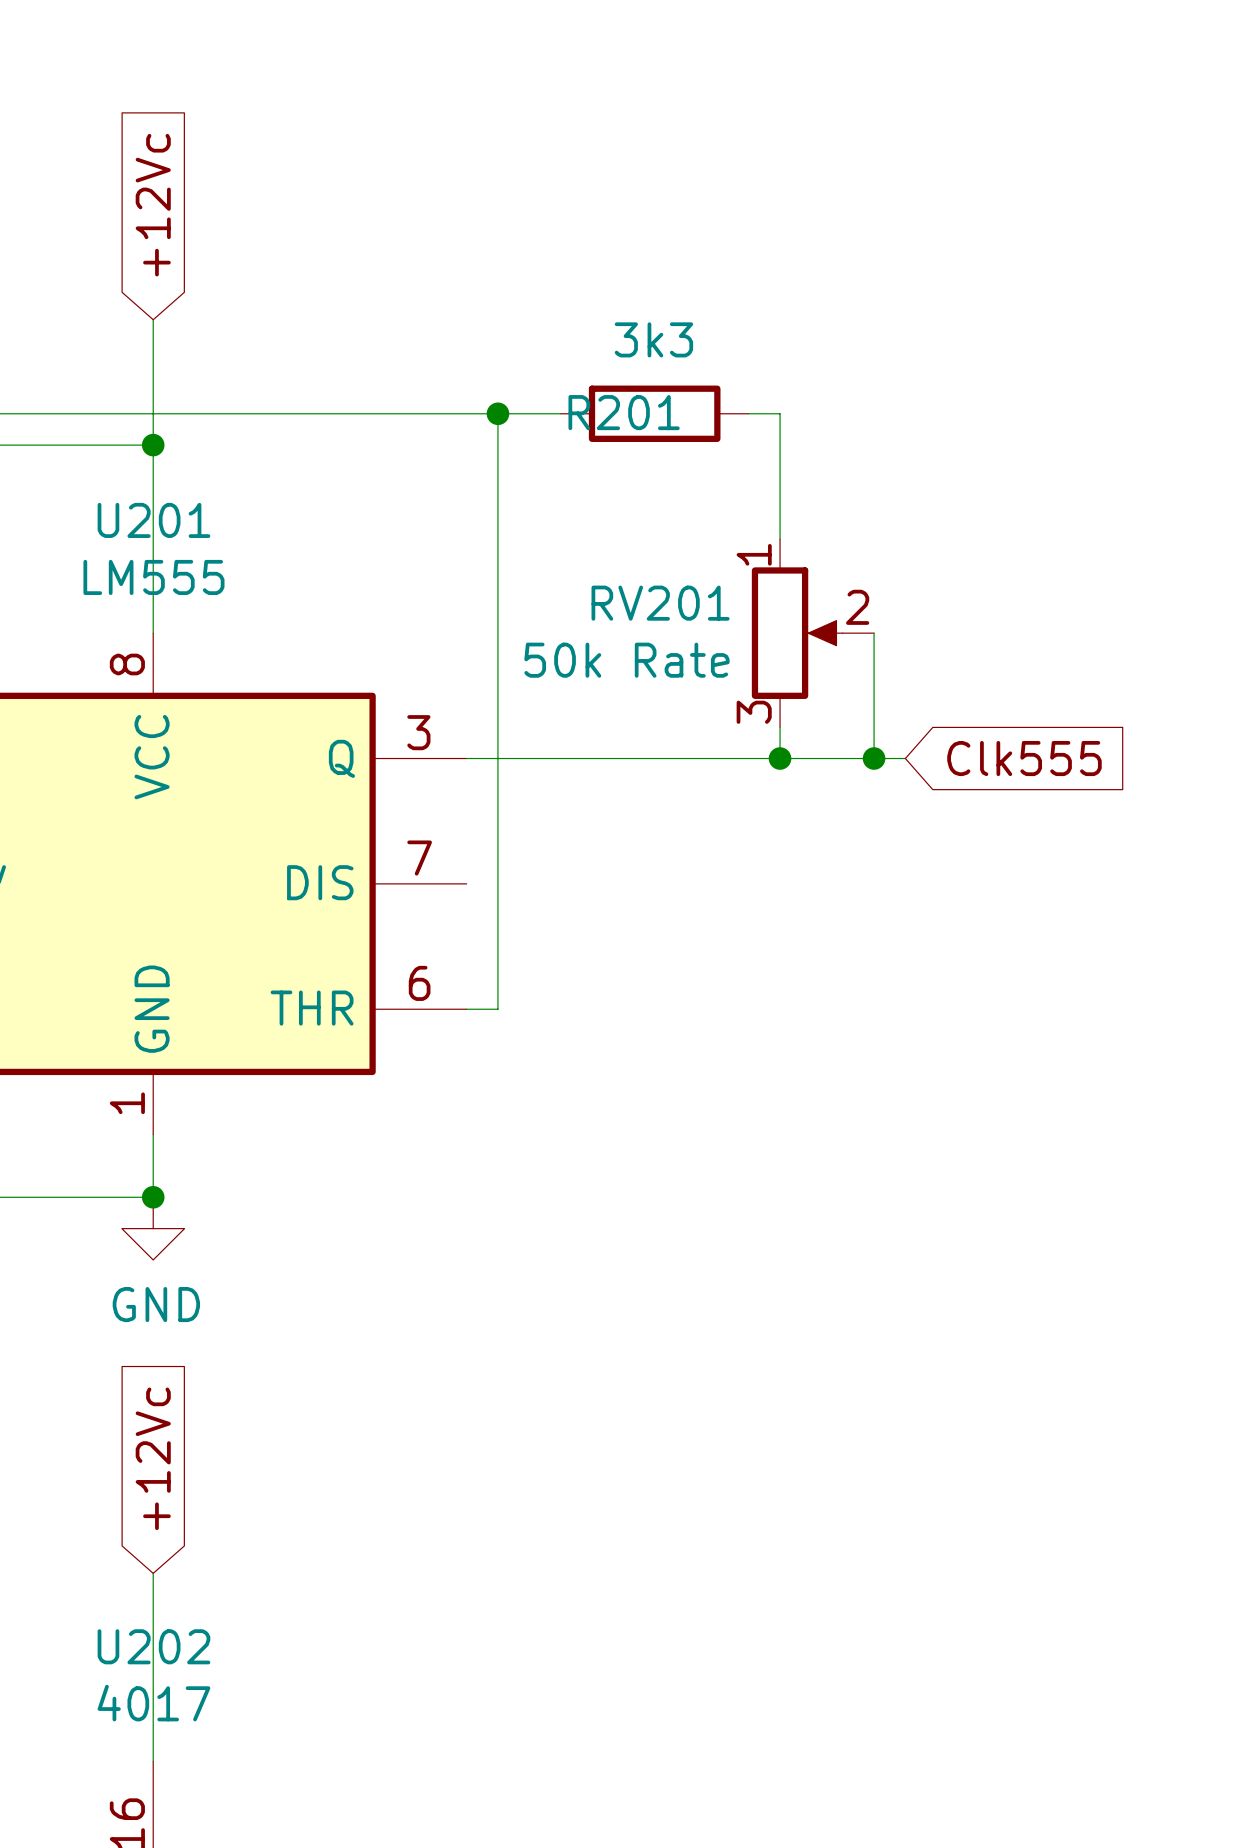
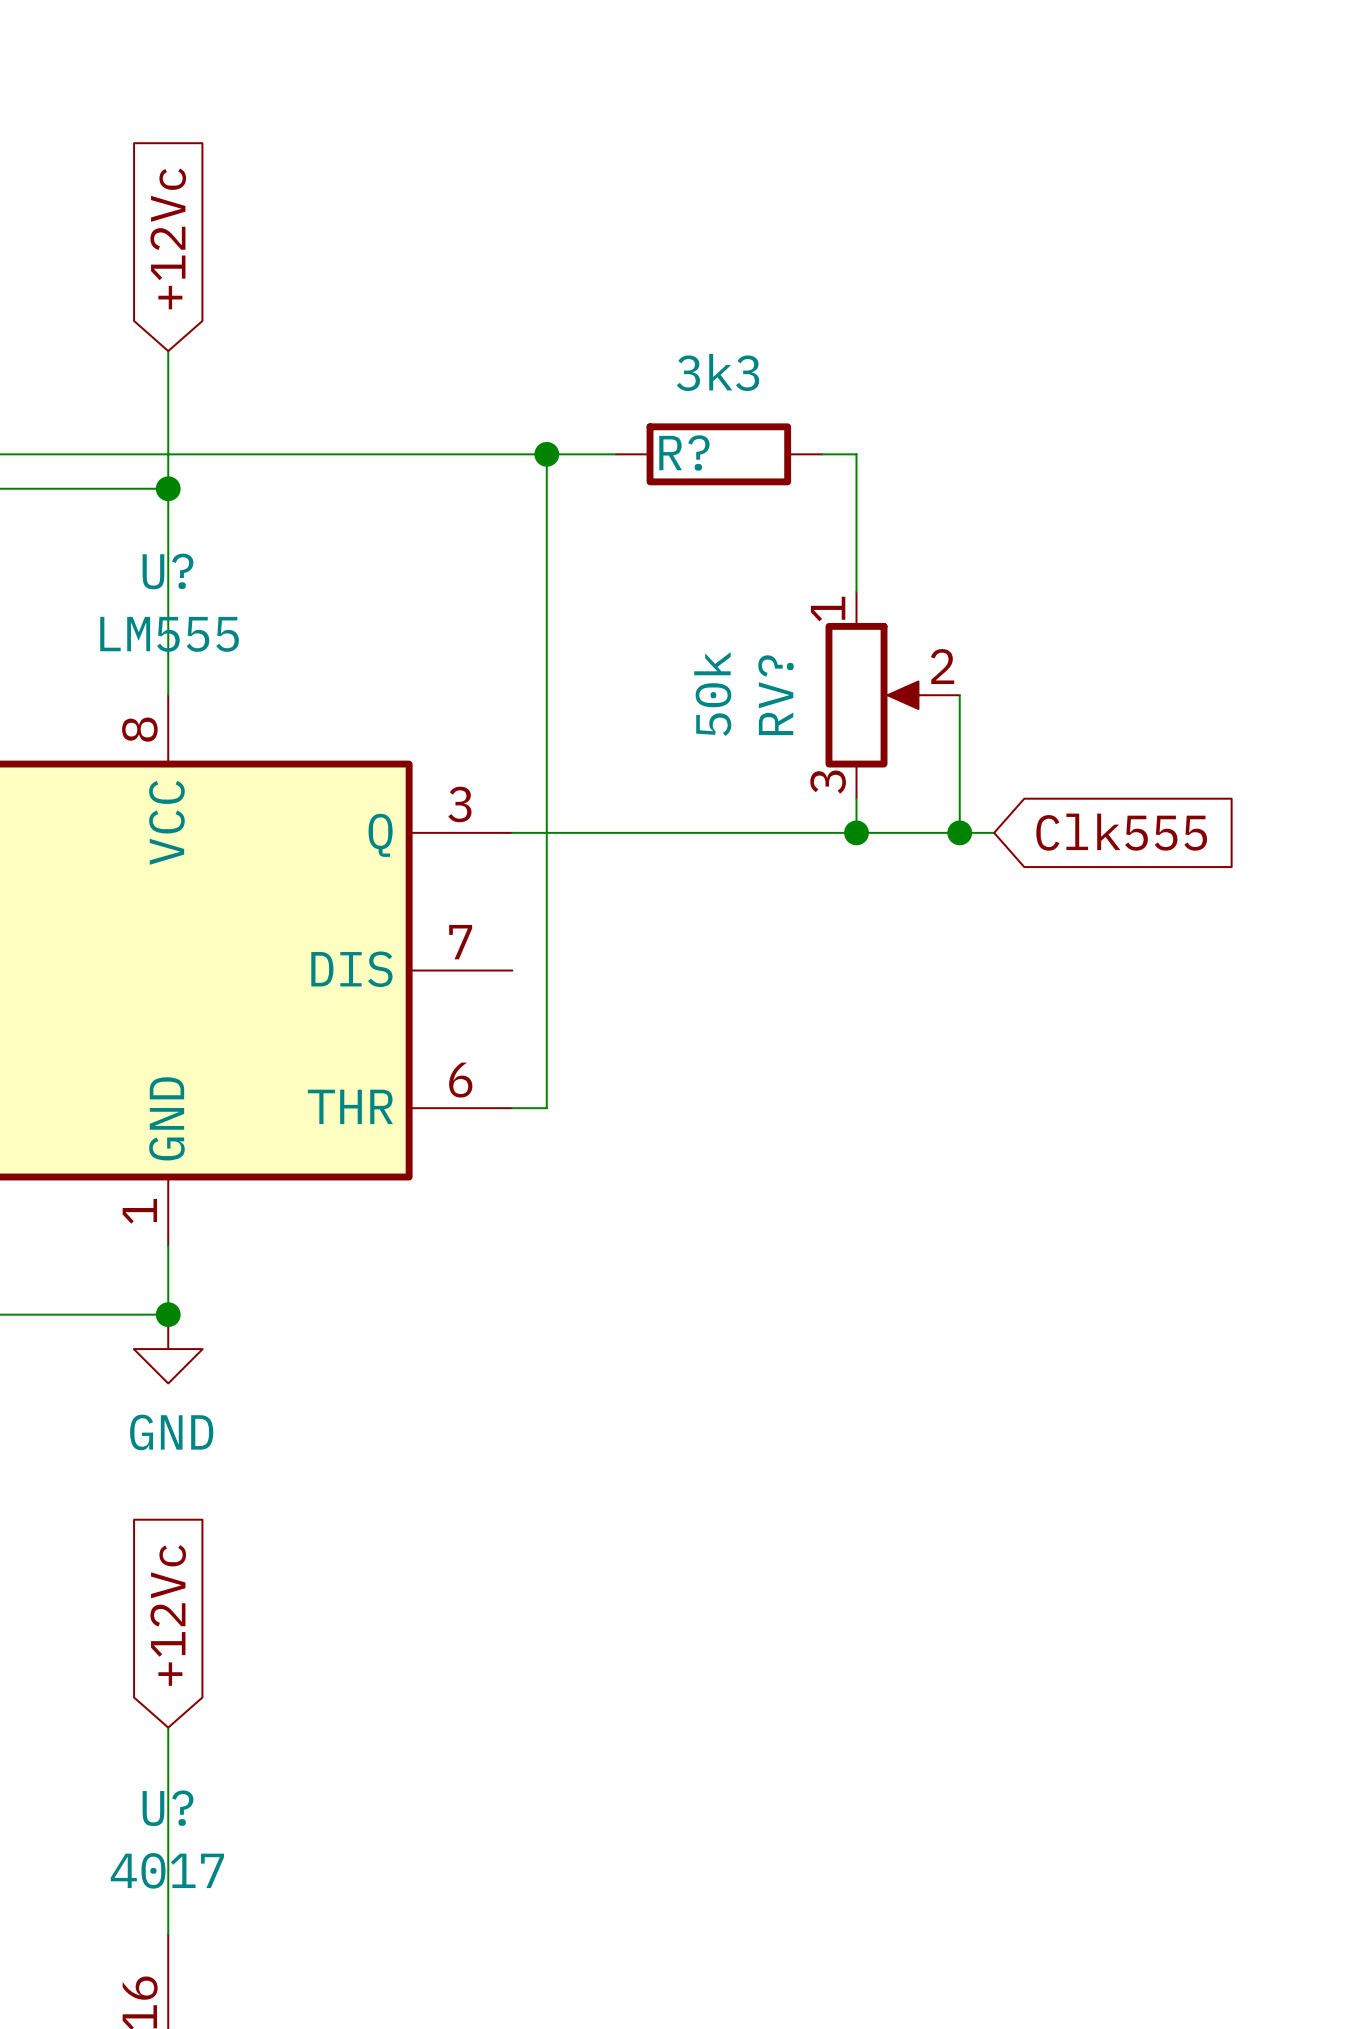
R201 name: R201 (624, 412) -> R? (684, 452)
U201 name: U201 (153, 520) -> U? (168, 571)
RV201 name: RV201 (660, 603) -> RV? (775, 695)
RV201 value: 50k Rate (626, 660) -> 50k (712, 694)
U202 name: U202 (153, 1646) -> U? (168, 1808)

